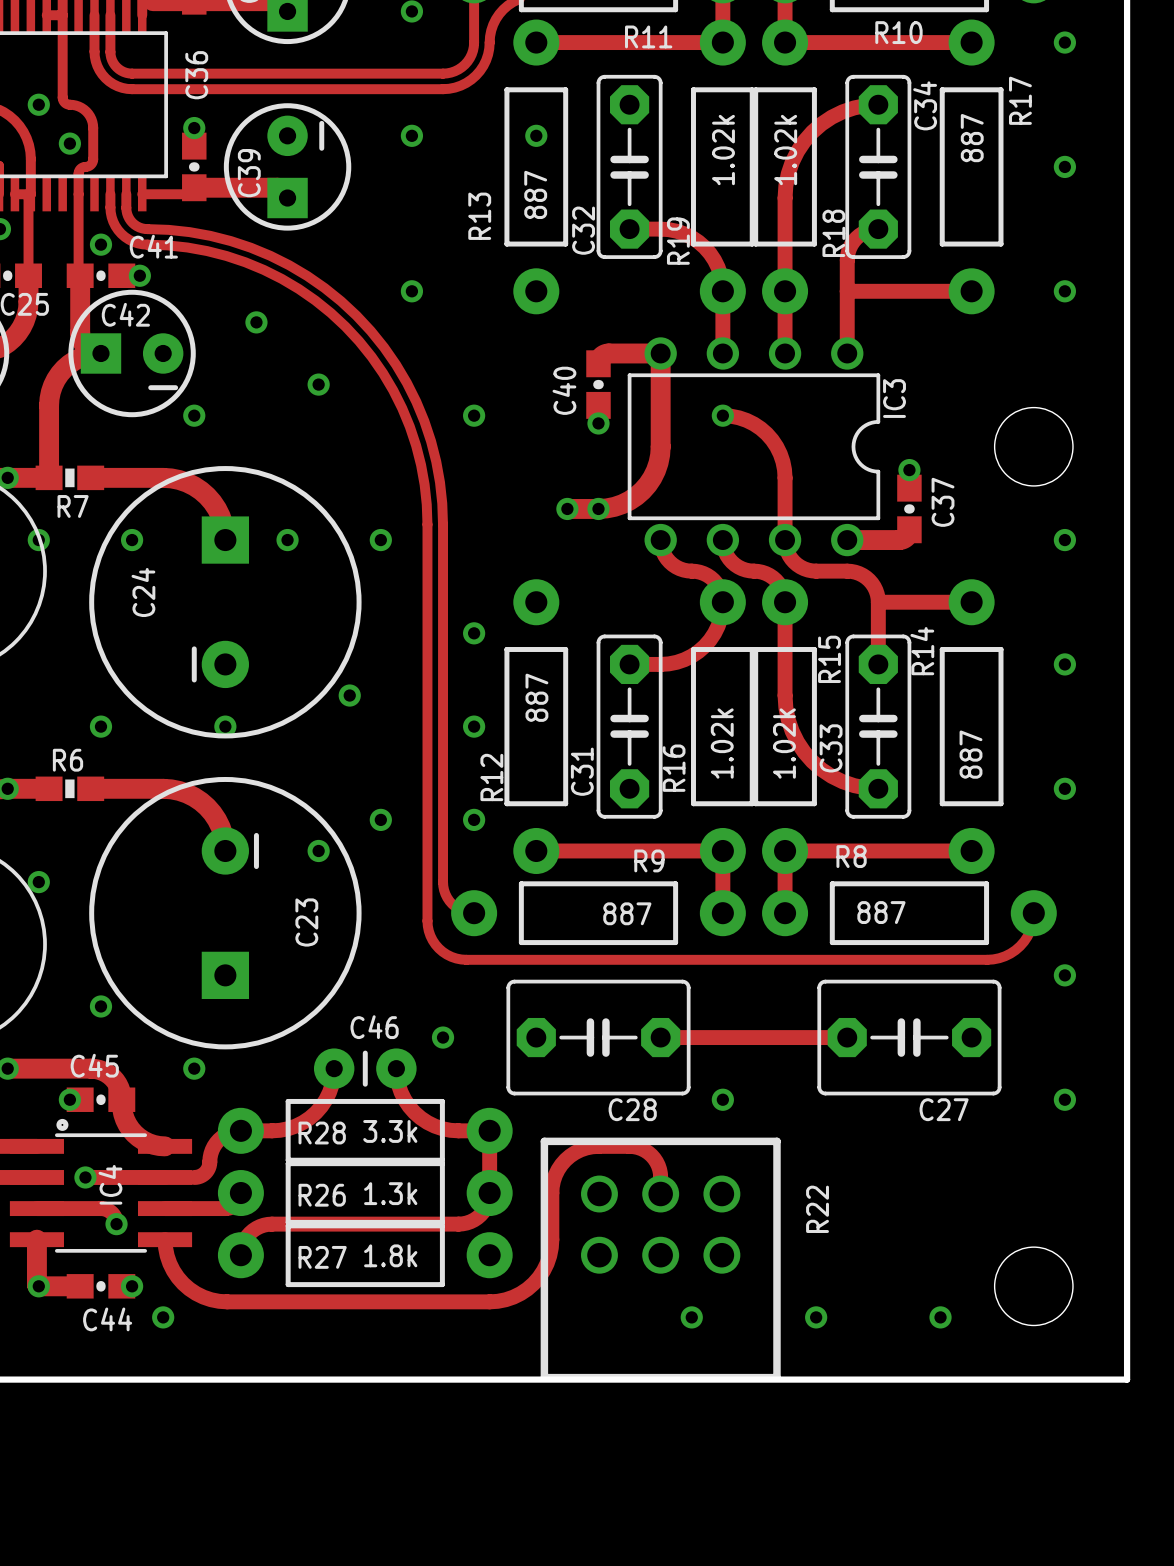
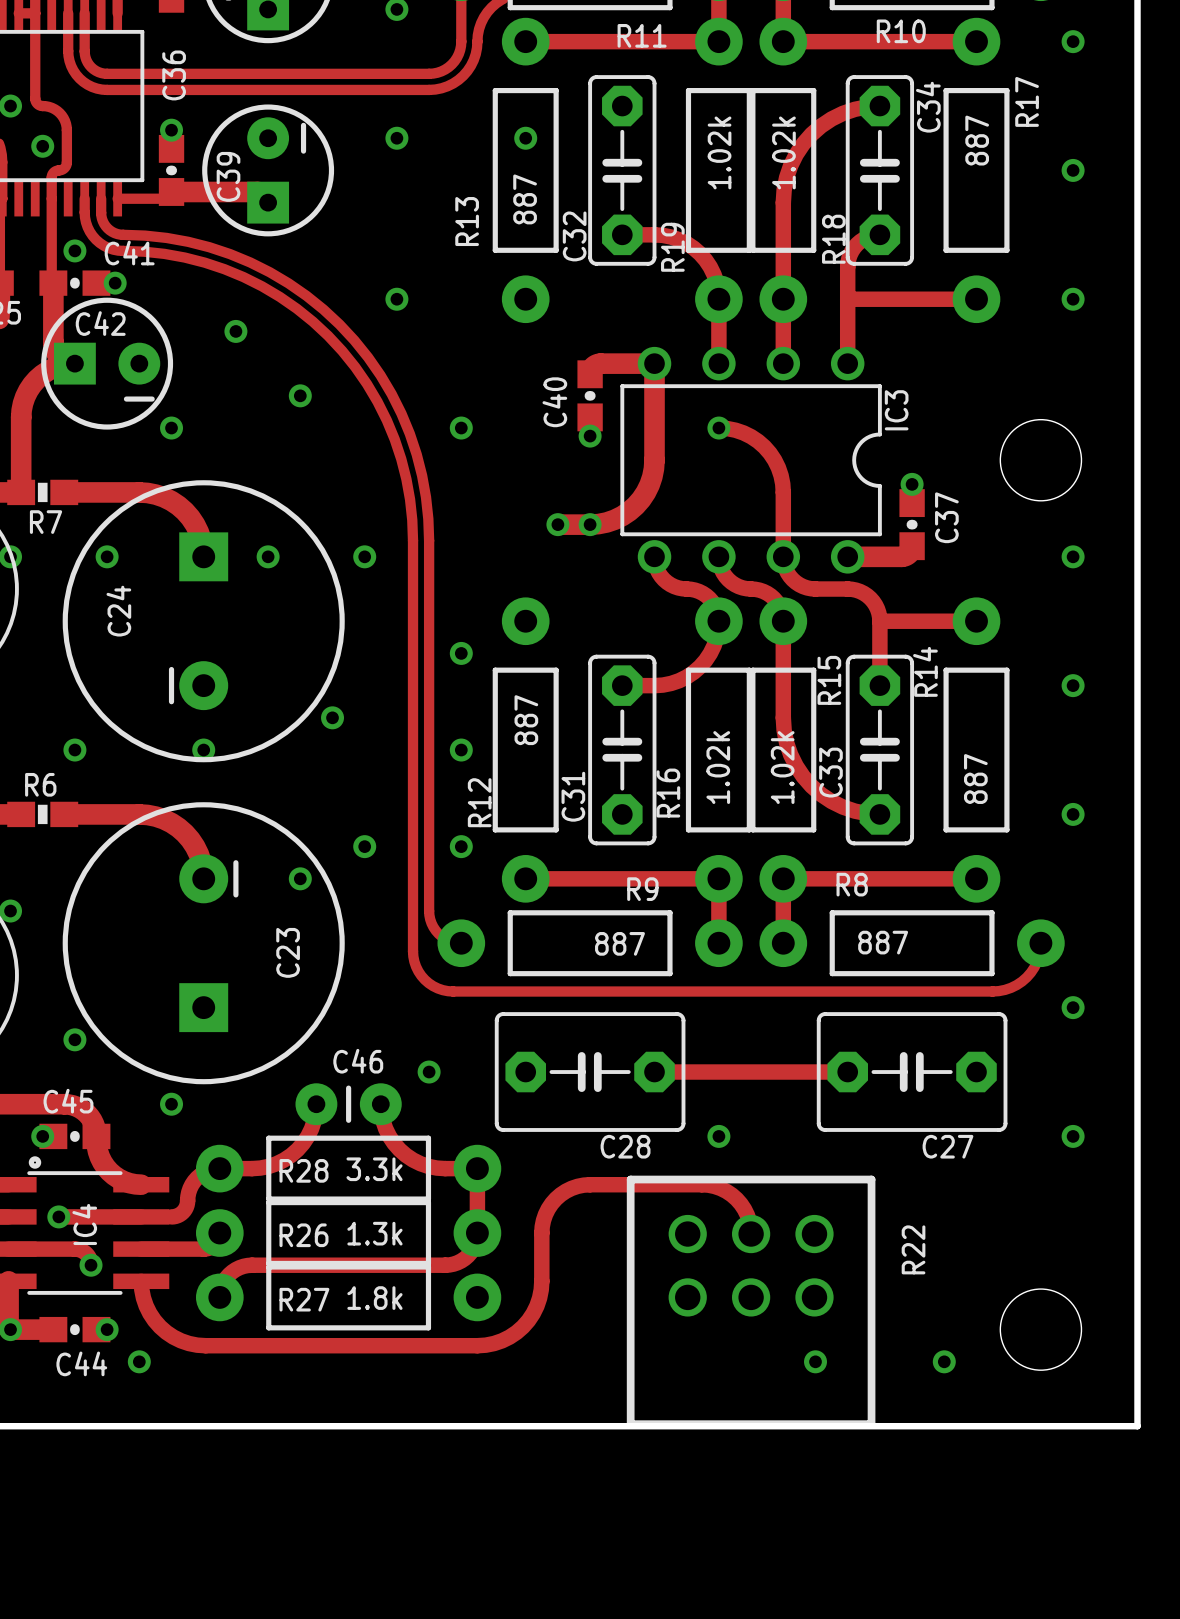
track: (629, 1146) (645, 1150) (656, 1161) (660, 1173) (660, 1194) -> (622, 1184) (701, 1184) (720, 1188) (731, 1194) (740, 1204) (747, 1215) (751, 1234)
R22 position: (660, 1259) -> (751, 1301)
via: (691, 1317) -> none

